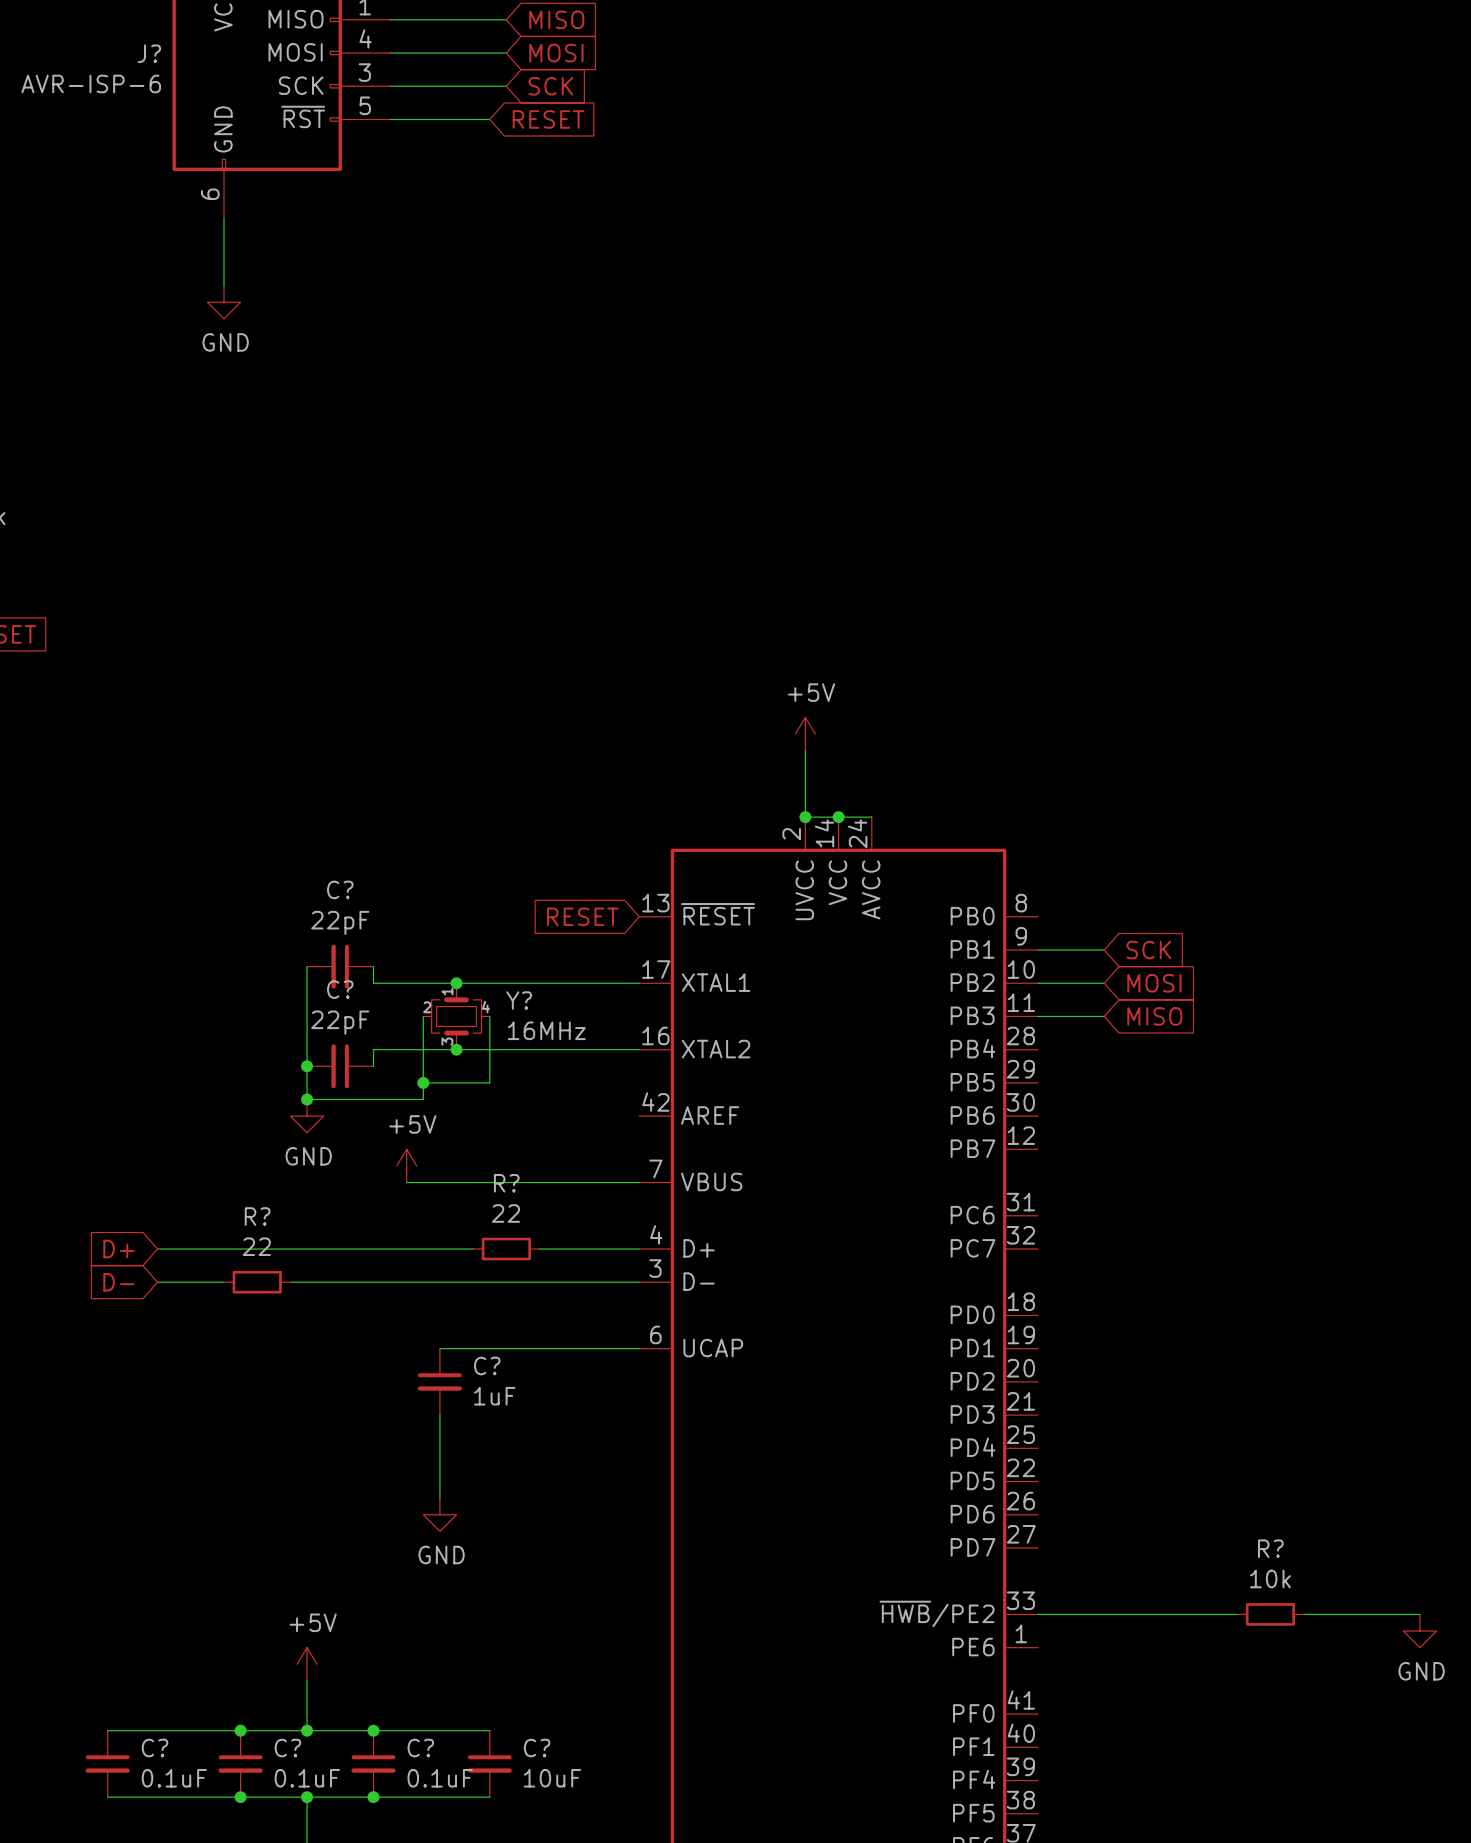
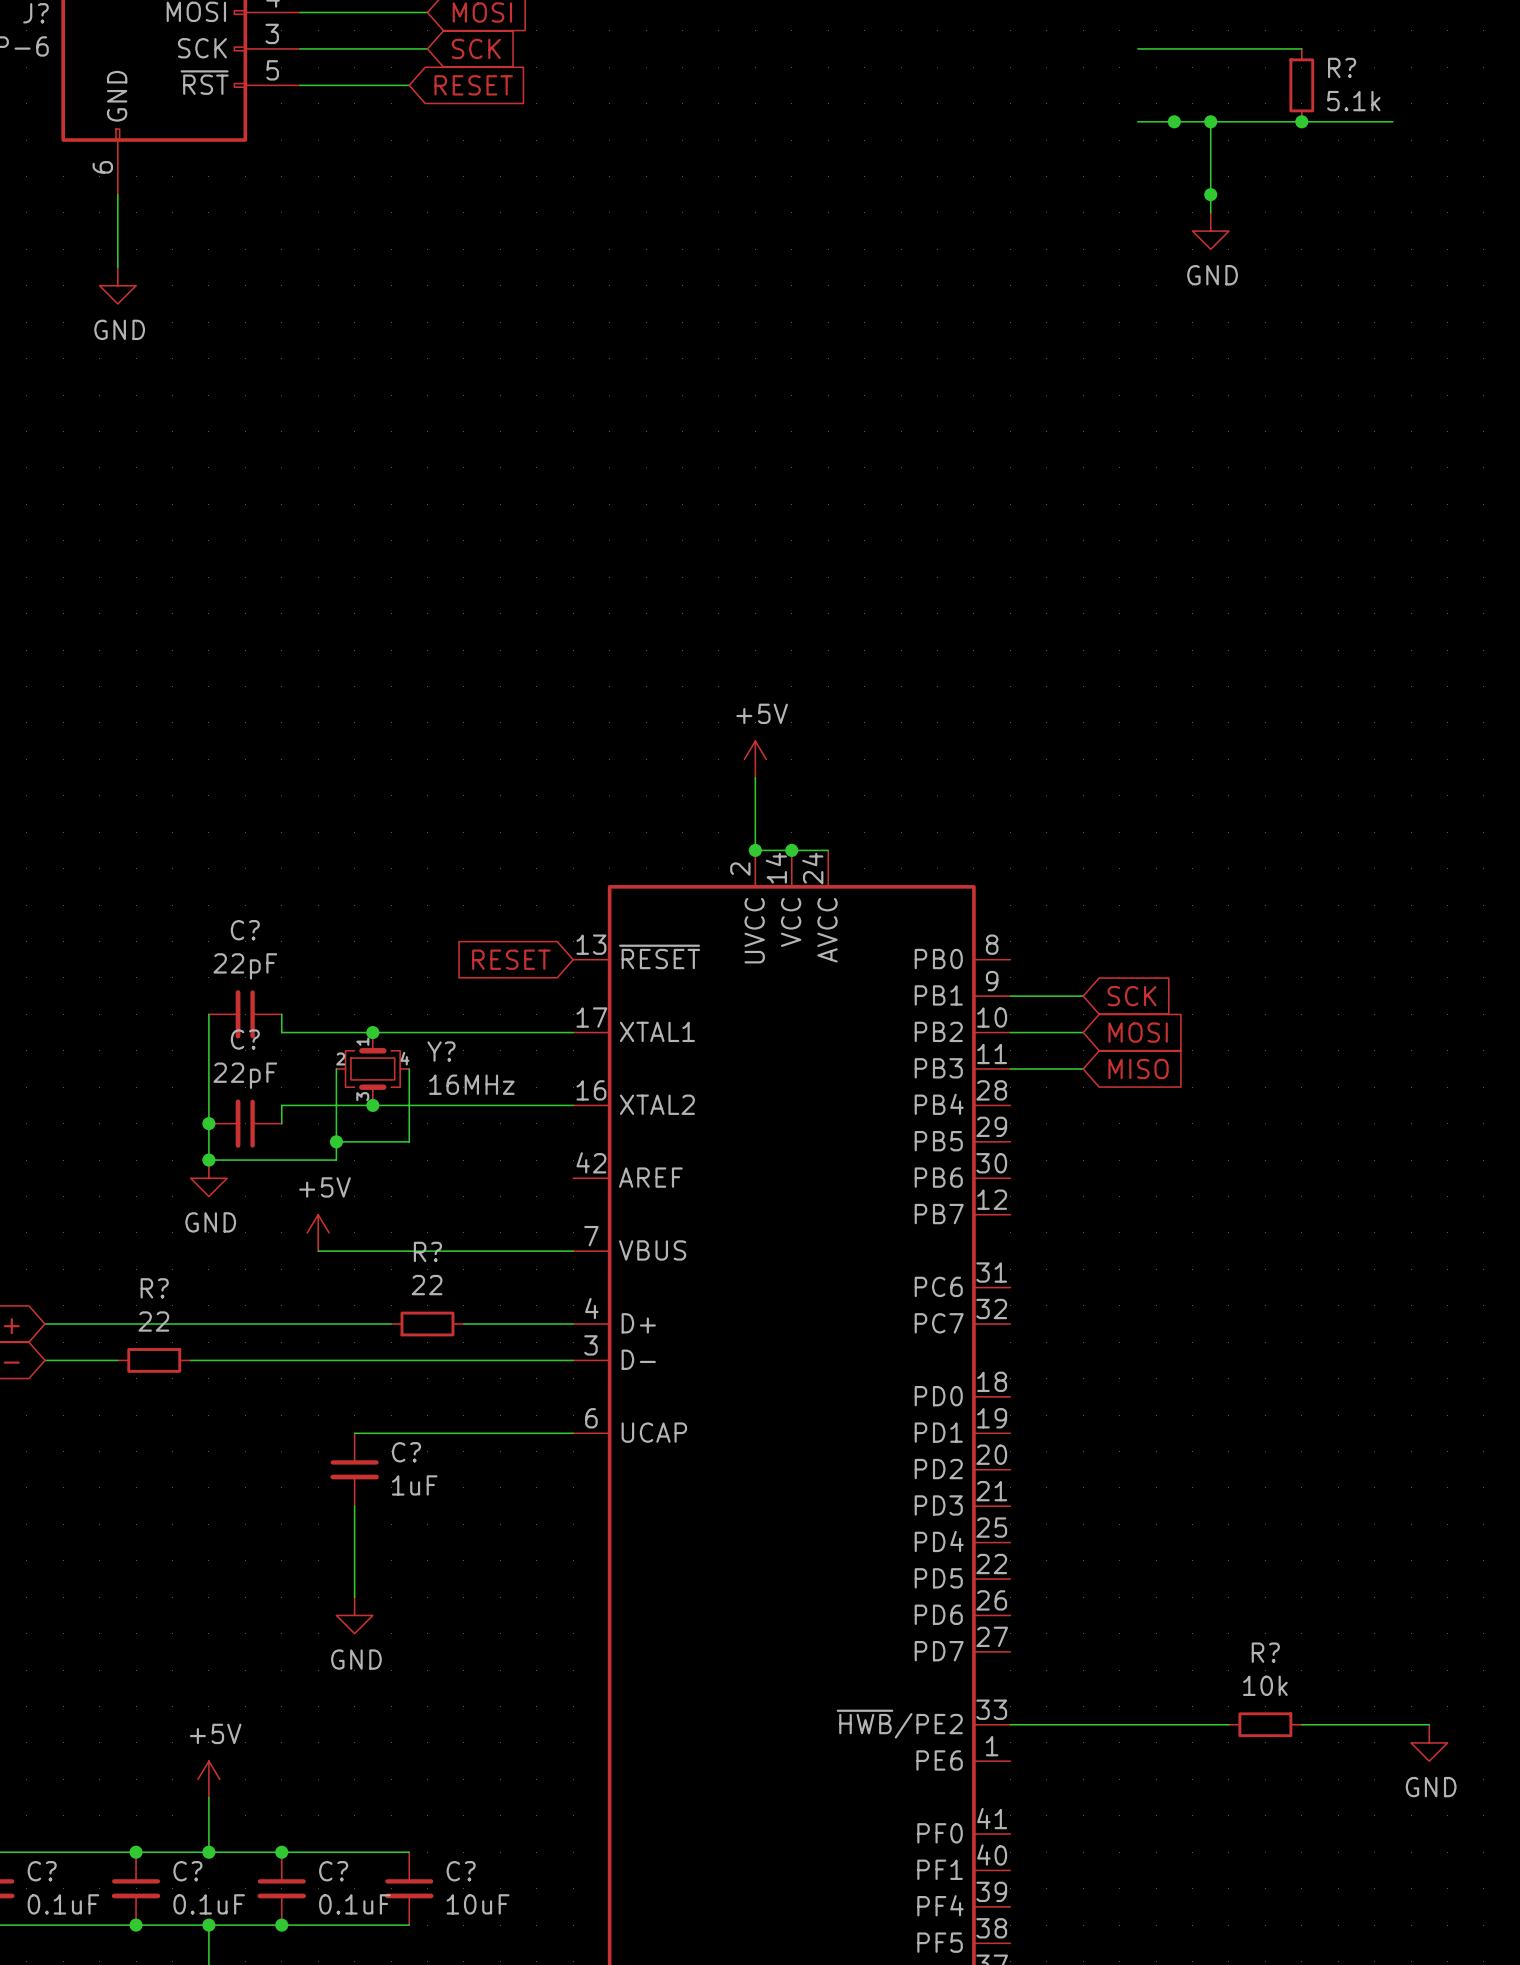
wire: none -> (1137, 48) (1301, 48)
R?: none -> 5.1k (1301, 85)
wire: none -> (1137, 121) (1392, 121)
junction: none -> (1174, 121)
wire: none -> (1210, 121) (1210, 212)
junction: none -> (1210, 121)
junction: none -> (1301, 121)
junction: none -> (1210, 194)
power symbol: none -> GND (1210, 231)

